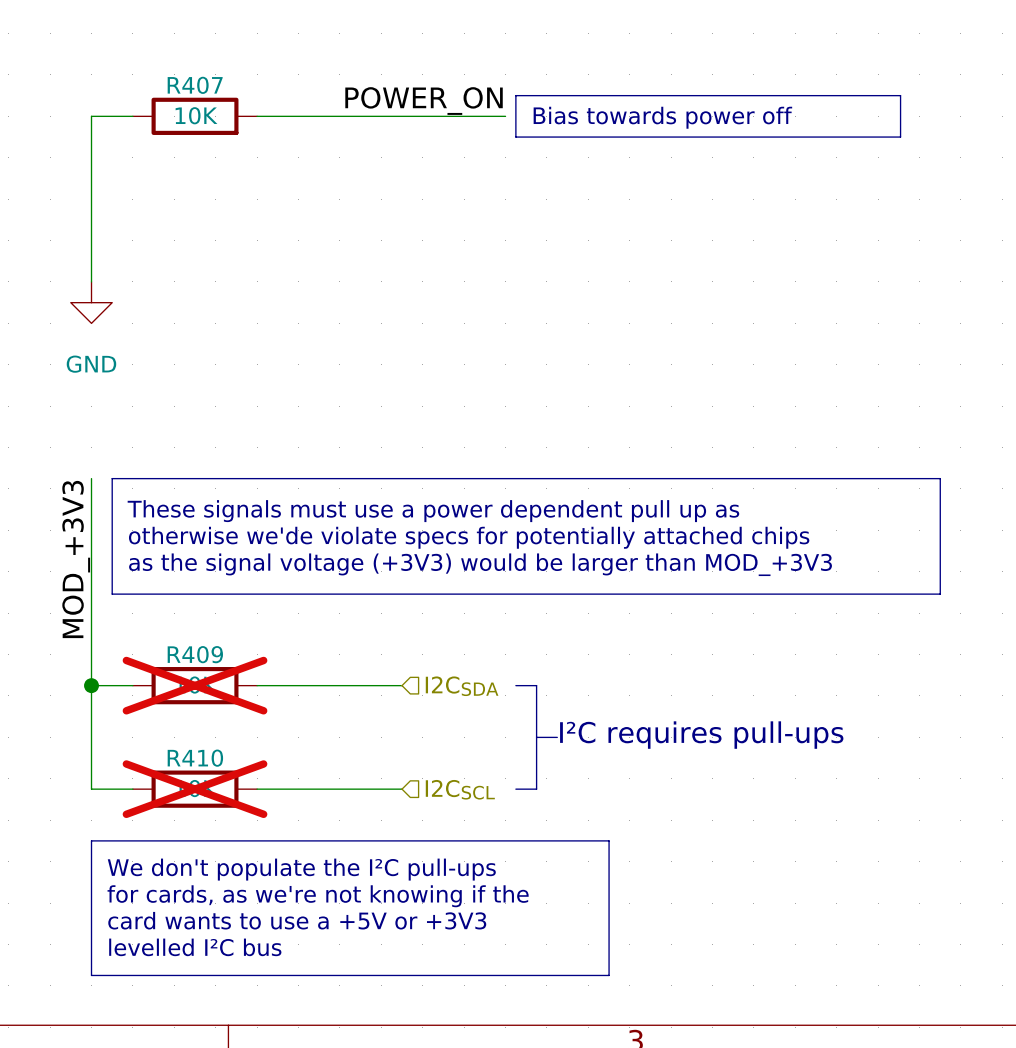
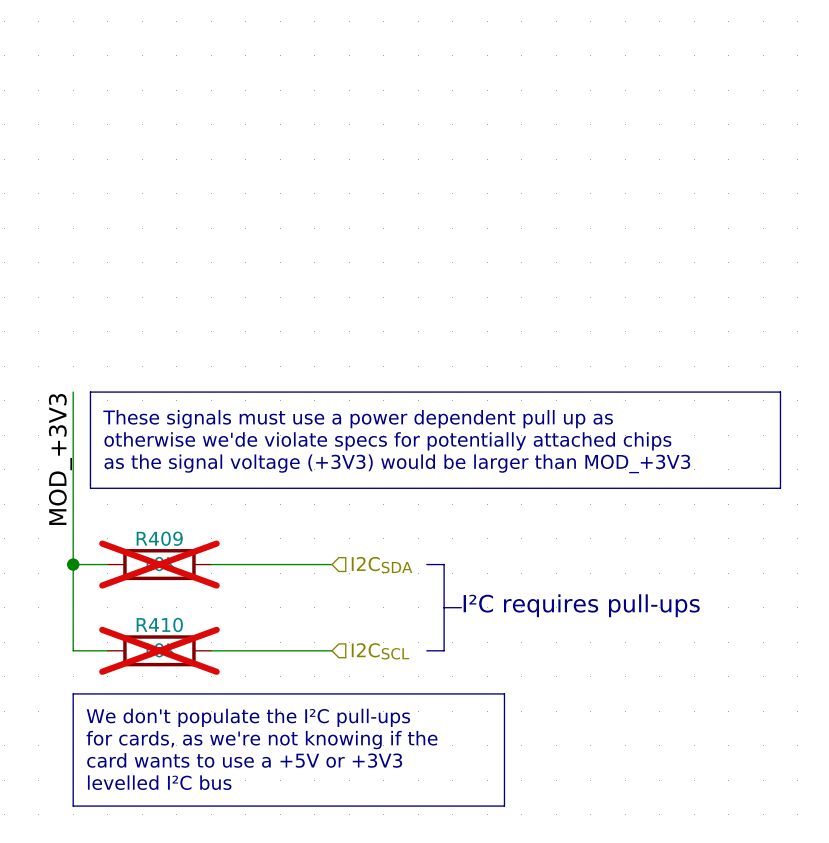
line: (515, 95) (900, 95) (900, 137) (515, 137) (515, 95) -> none
label: POWER_ON (424, 101) -> none
wire: (132, 116) (91, 116) (91, 281) -> none
R407: 10K (195, 116) -> none
wire: (257, 116) (505, 116) -> none
text: Bias towards power off (662, 117) -> none
power symbol: GND (91, 302) -> none

